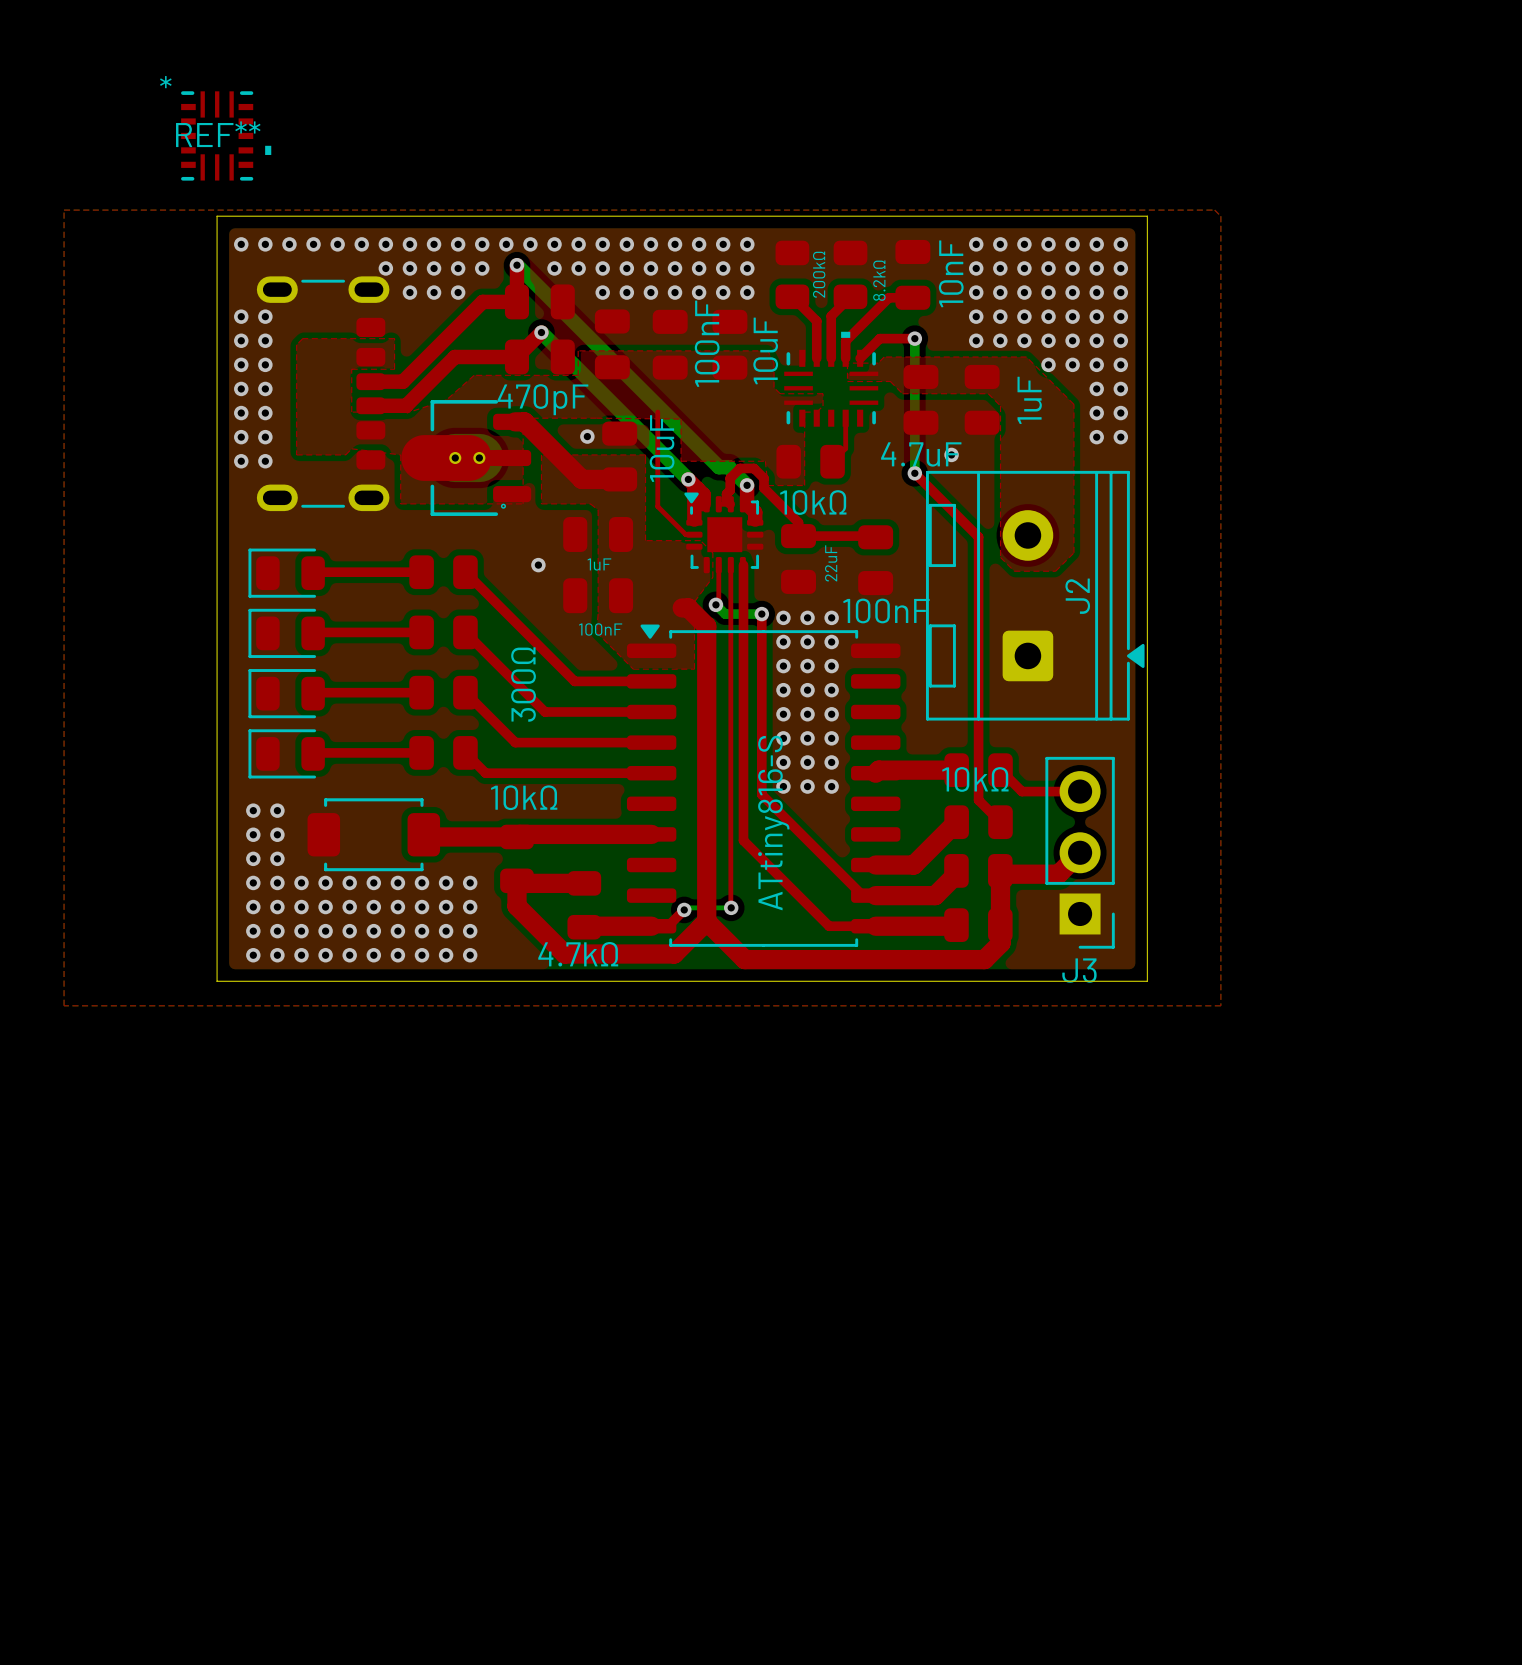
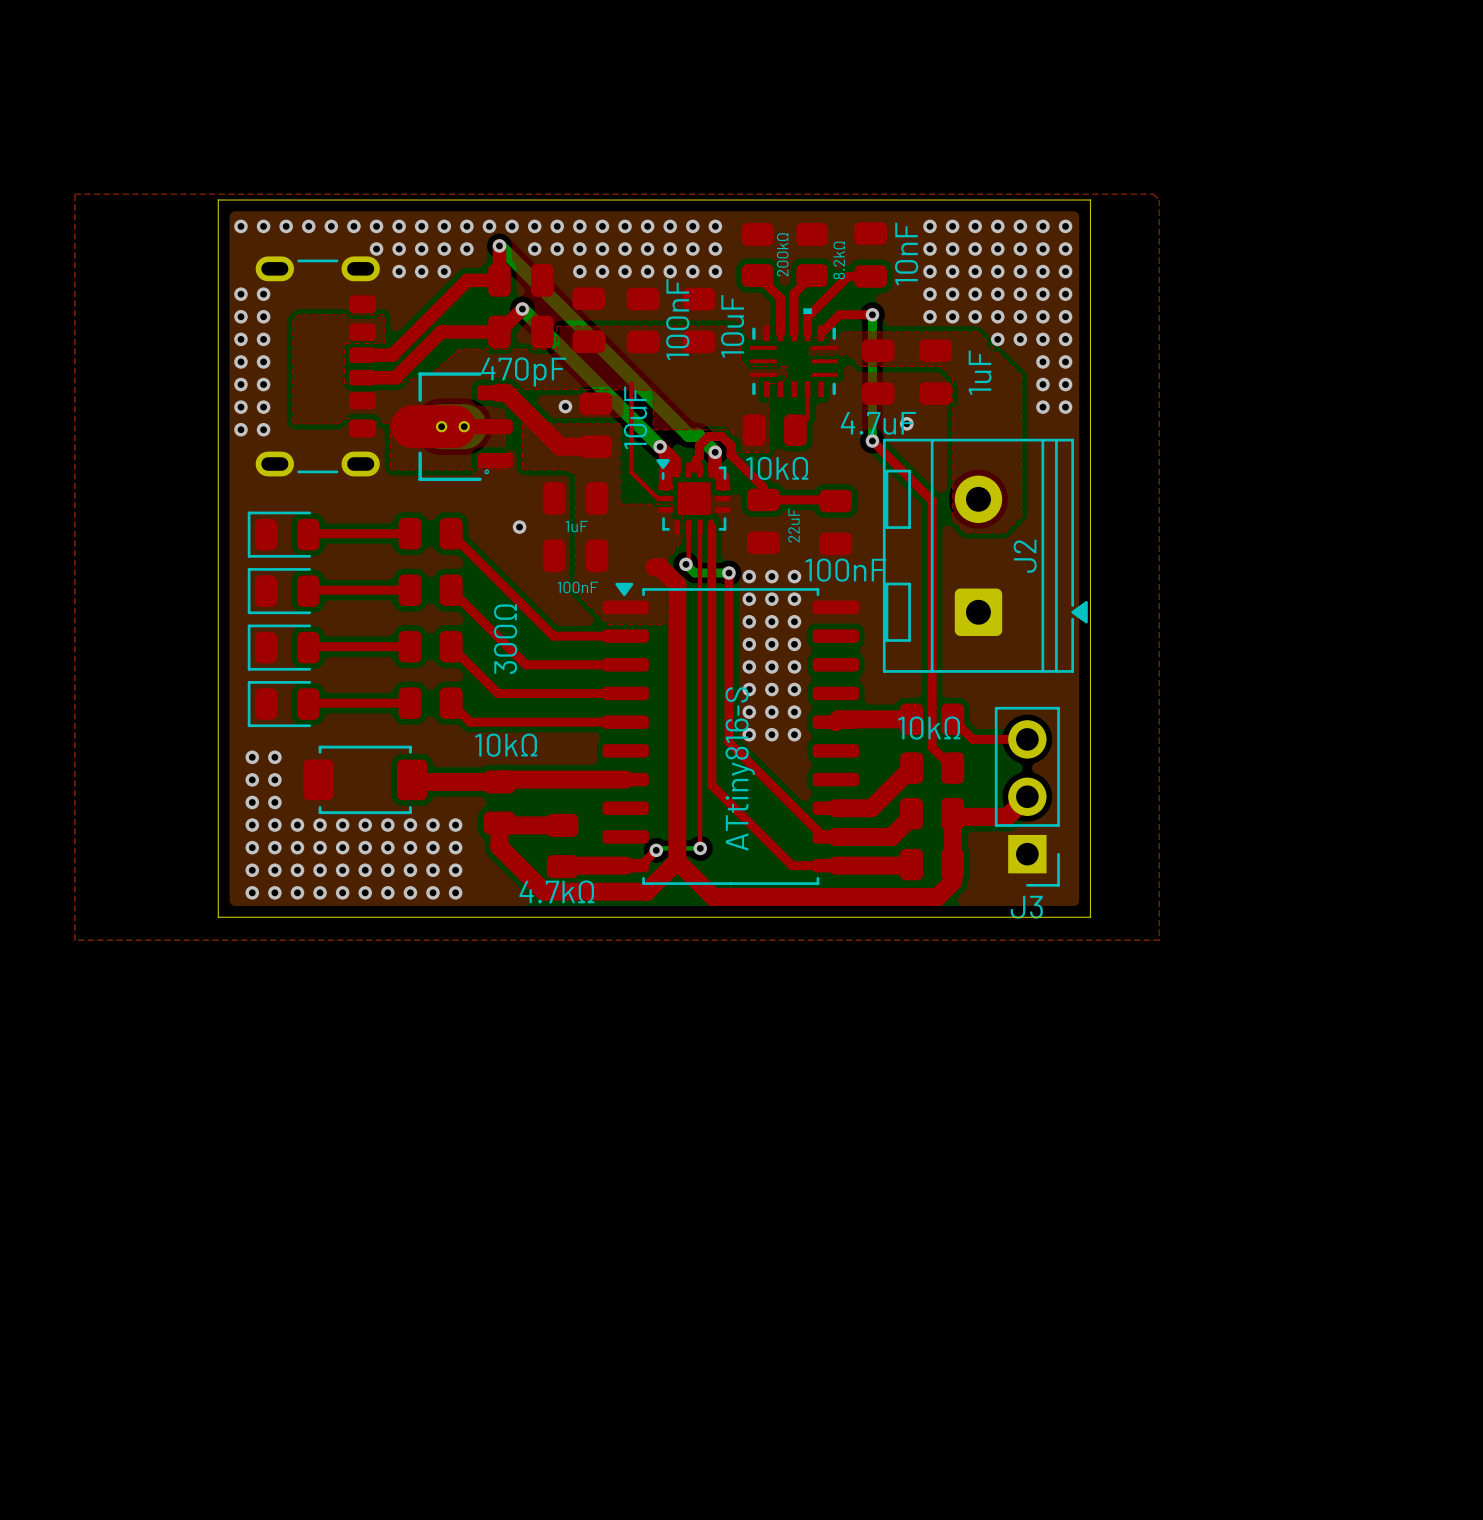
REF**: (226, 135) -> none

